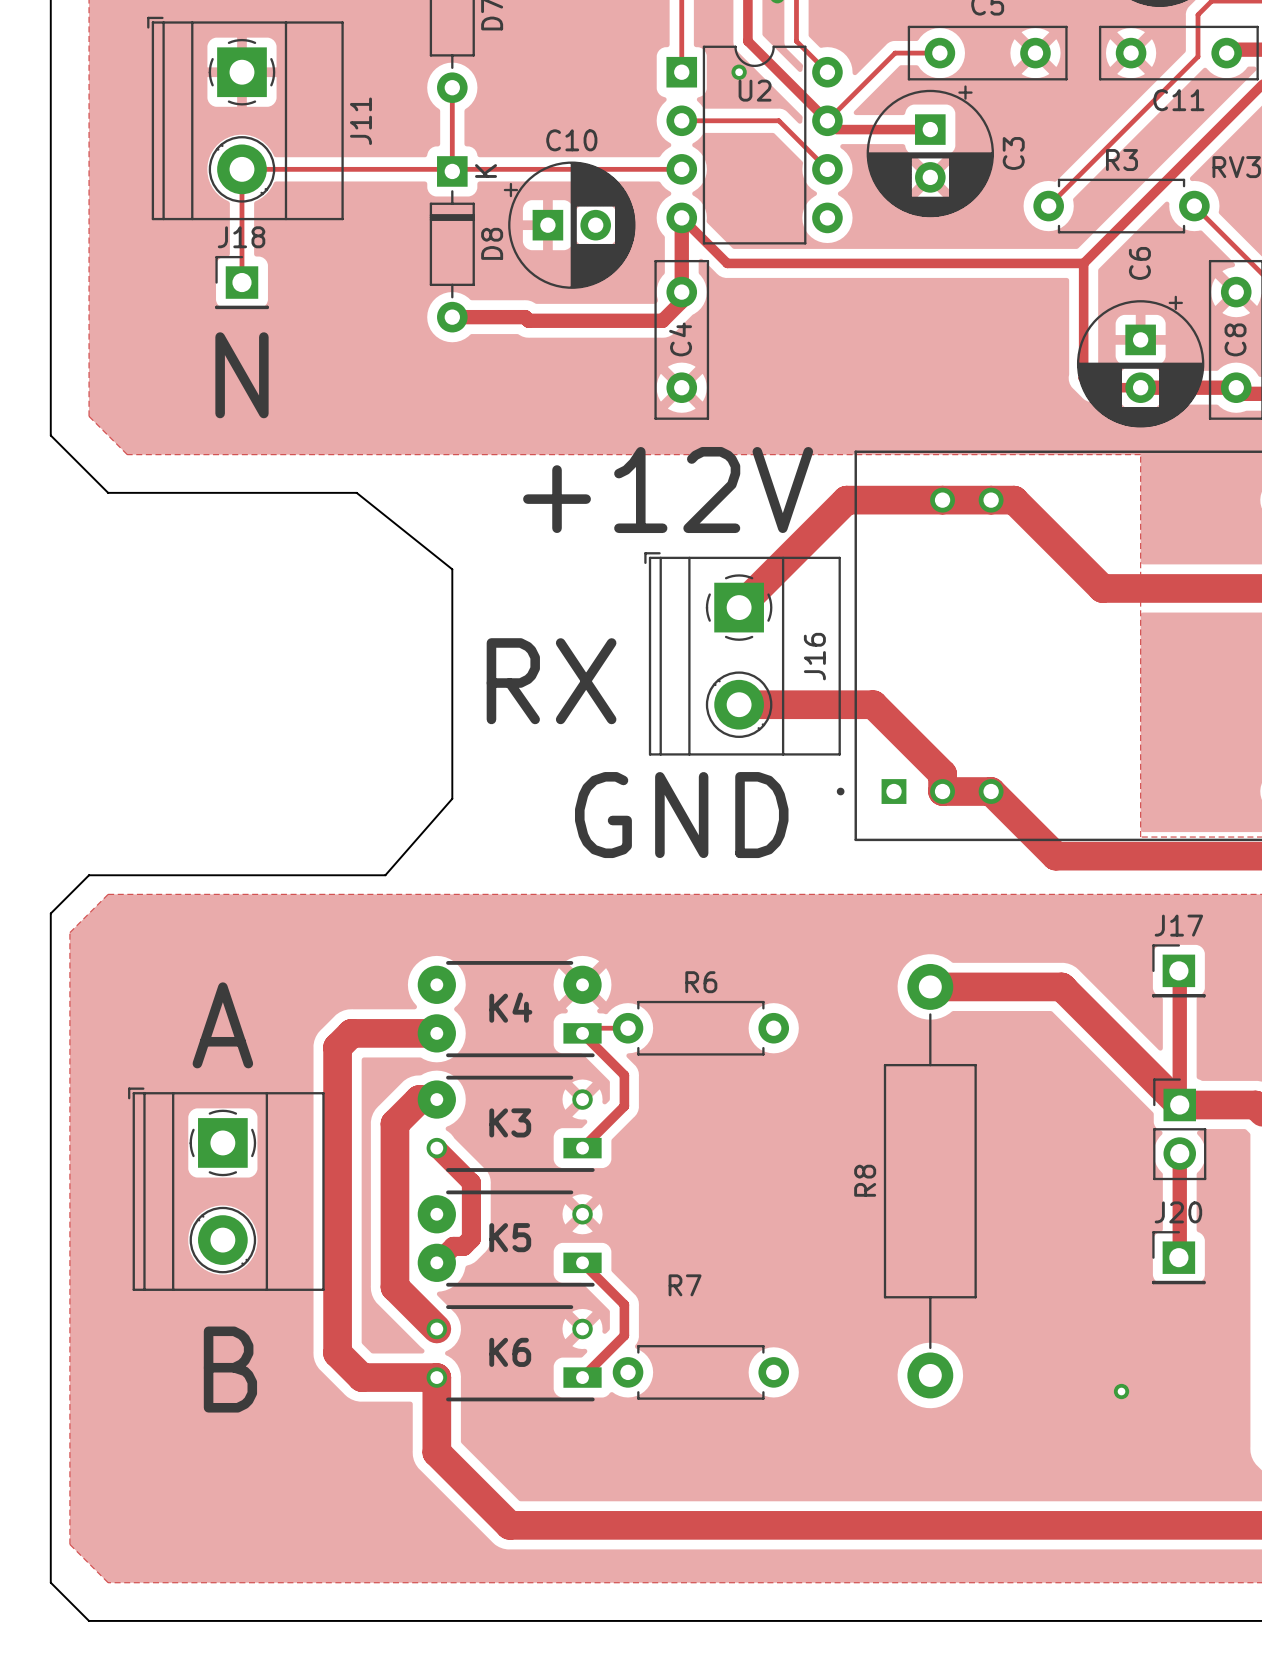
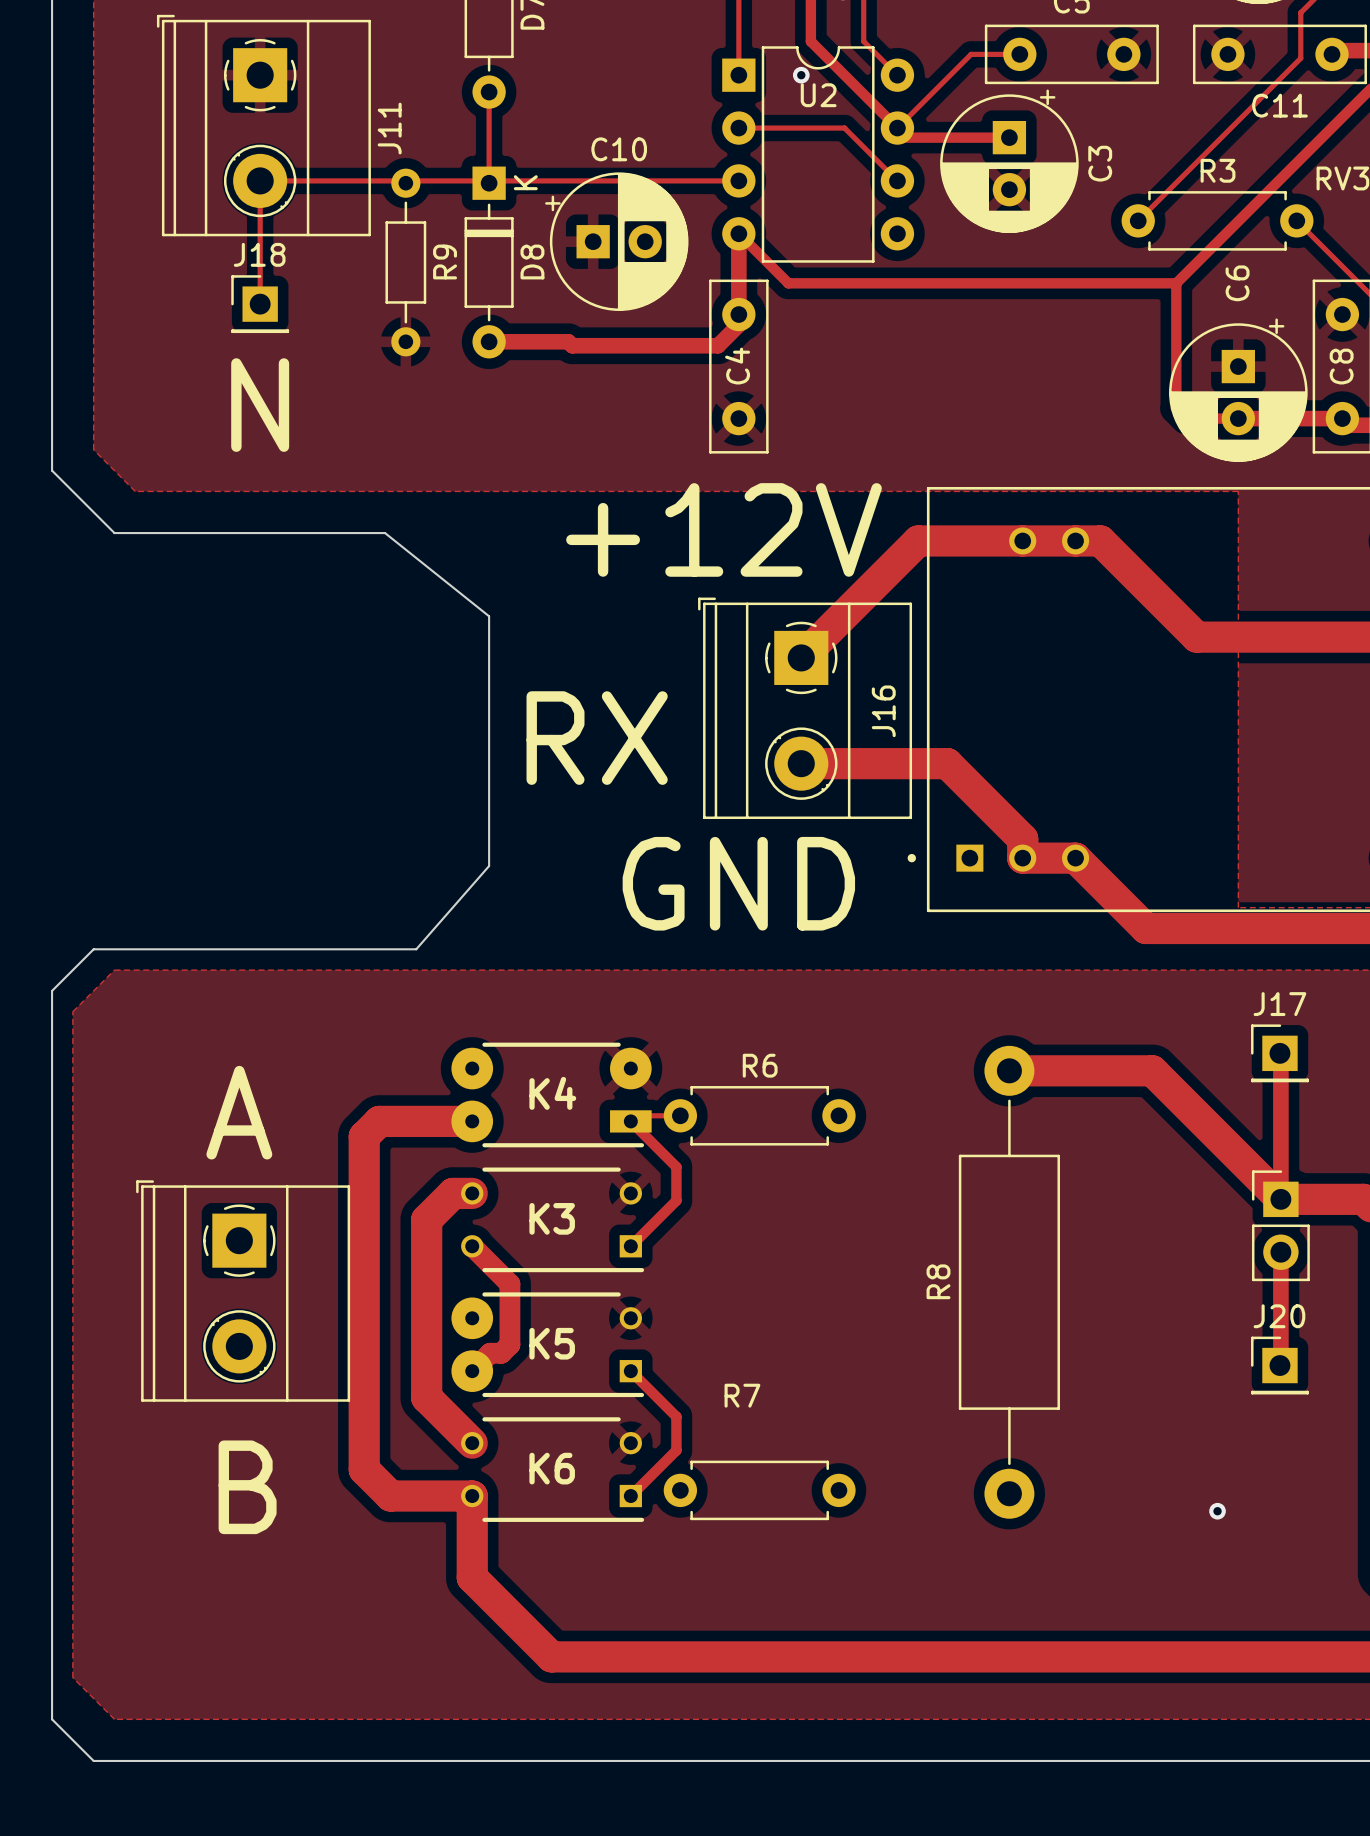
R9: none -> (405, 262)
K3 footprint: [417, 1075, 602, 1172] -> [461, 1167, 645, 1273]
K5 footprint: [417, 1190, 602, 1287] -> [451, 1292, 645, 1398]
K6 footprint: [426, 1305, 602, 1402] -> [461, 1417, 645, 1522]

